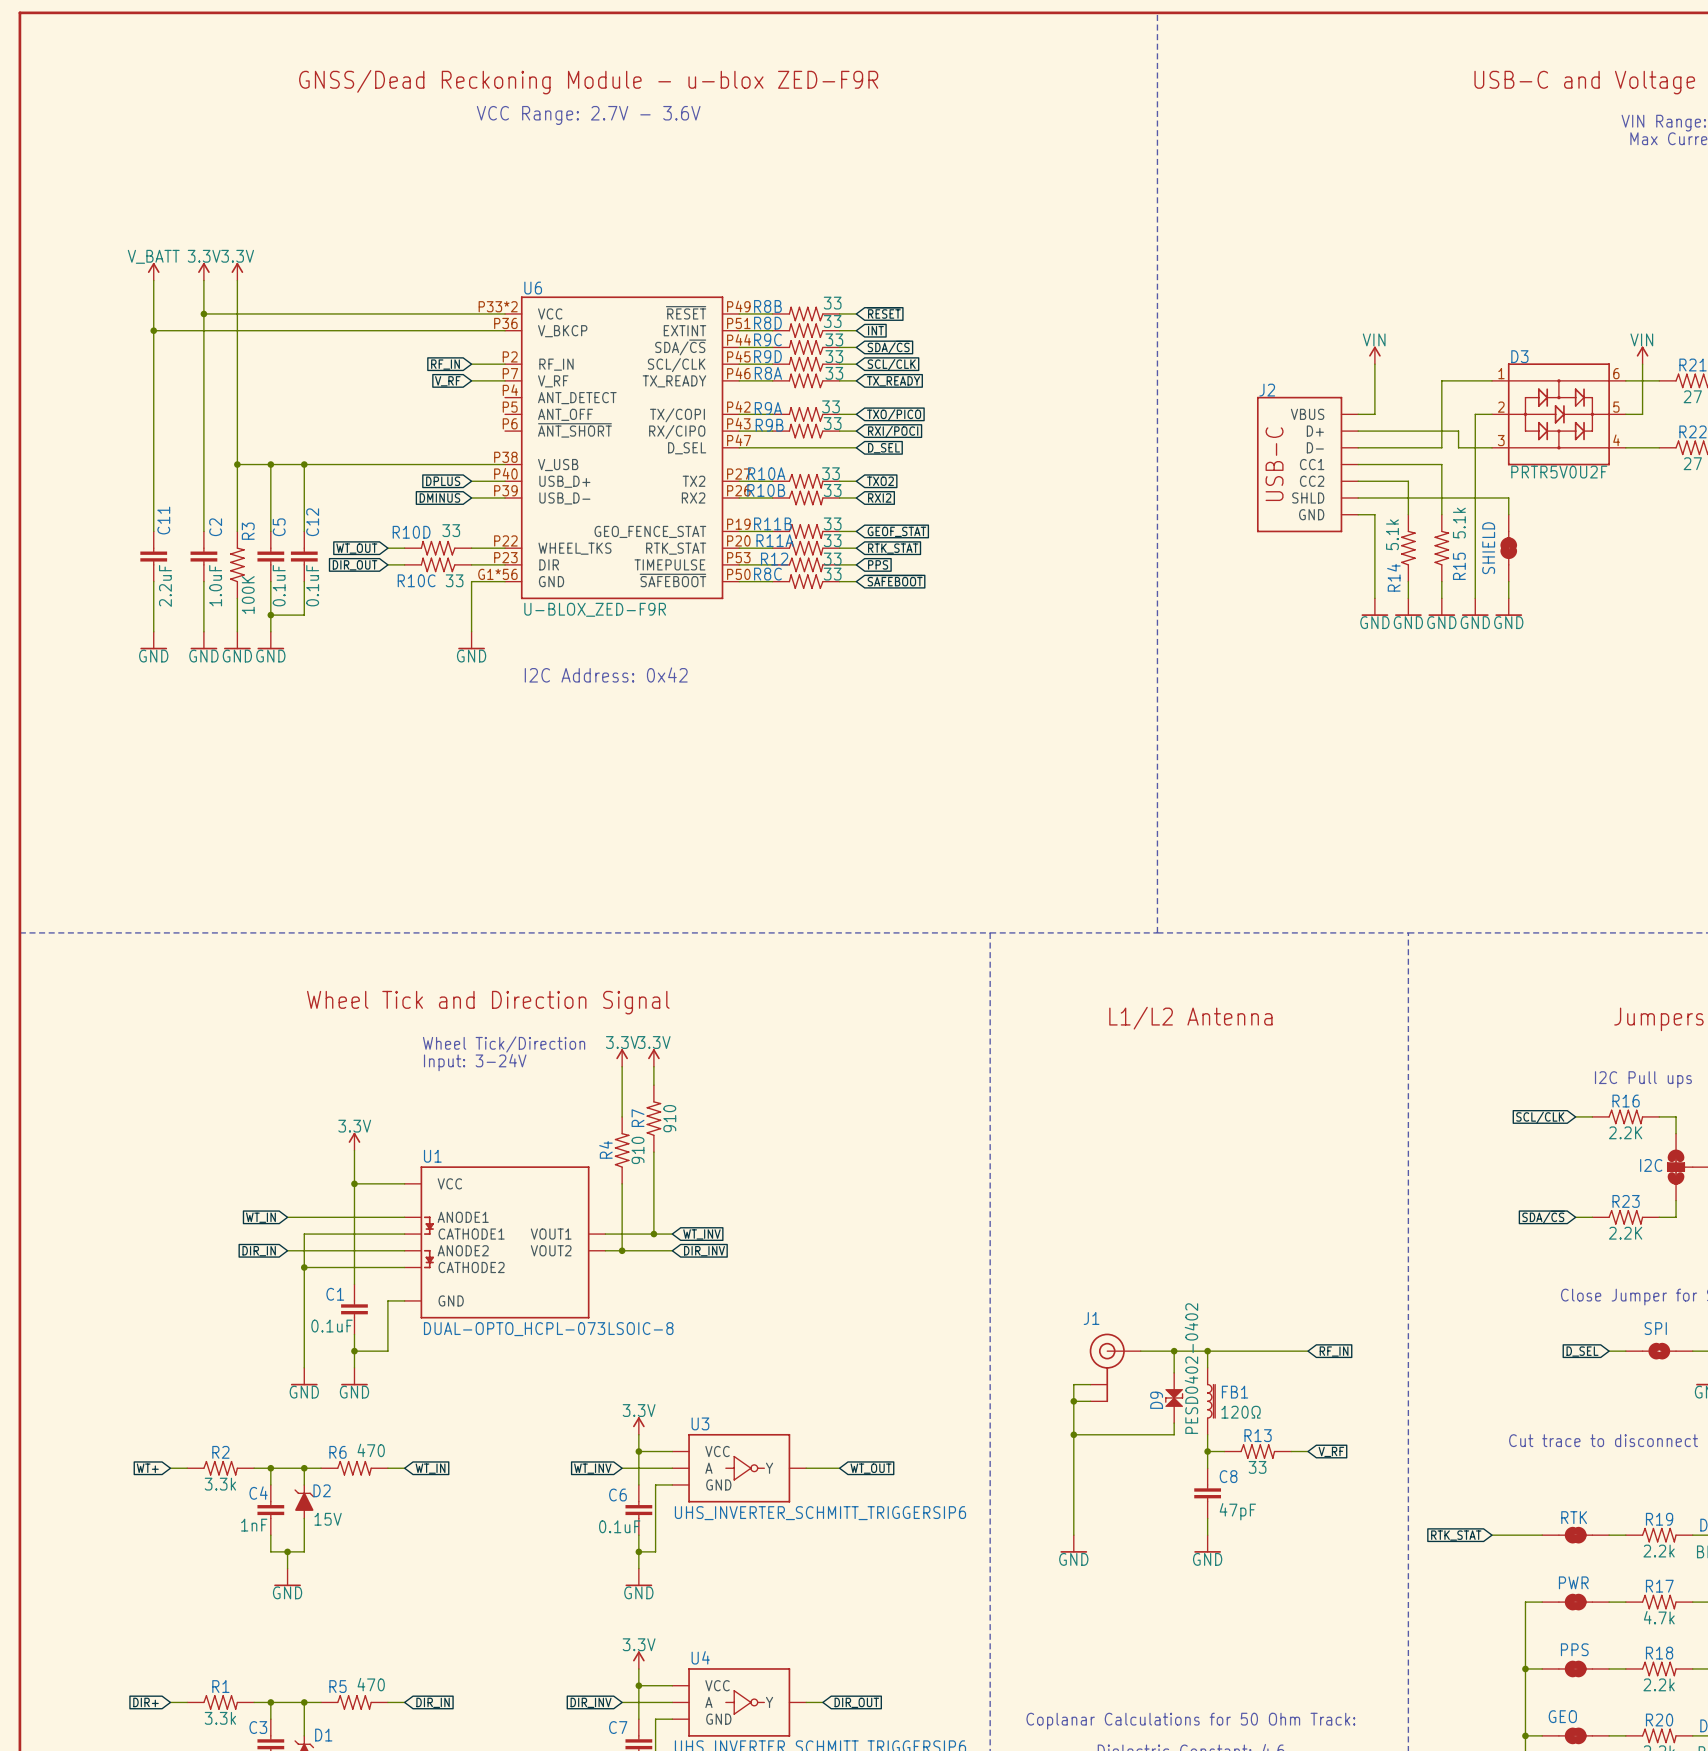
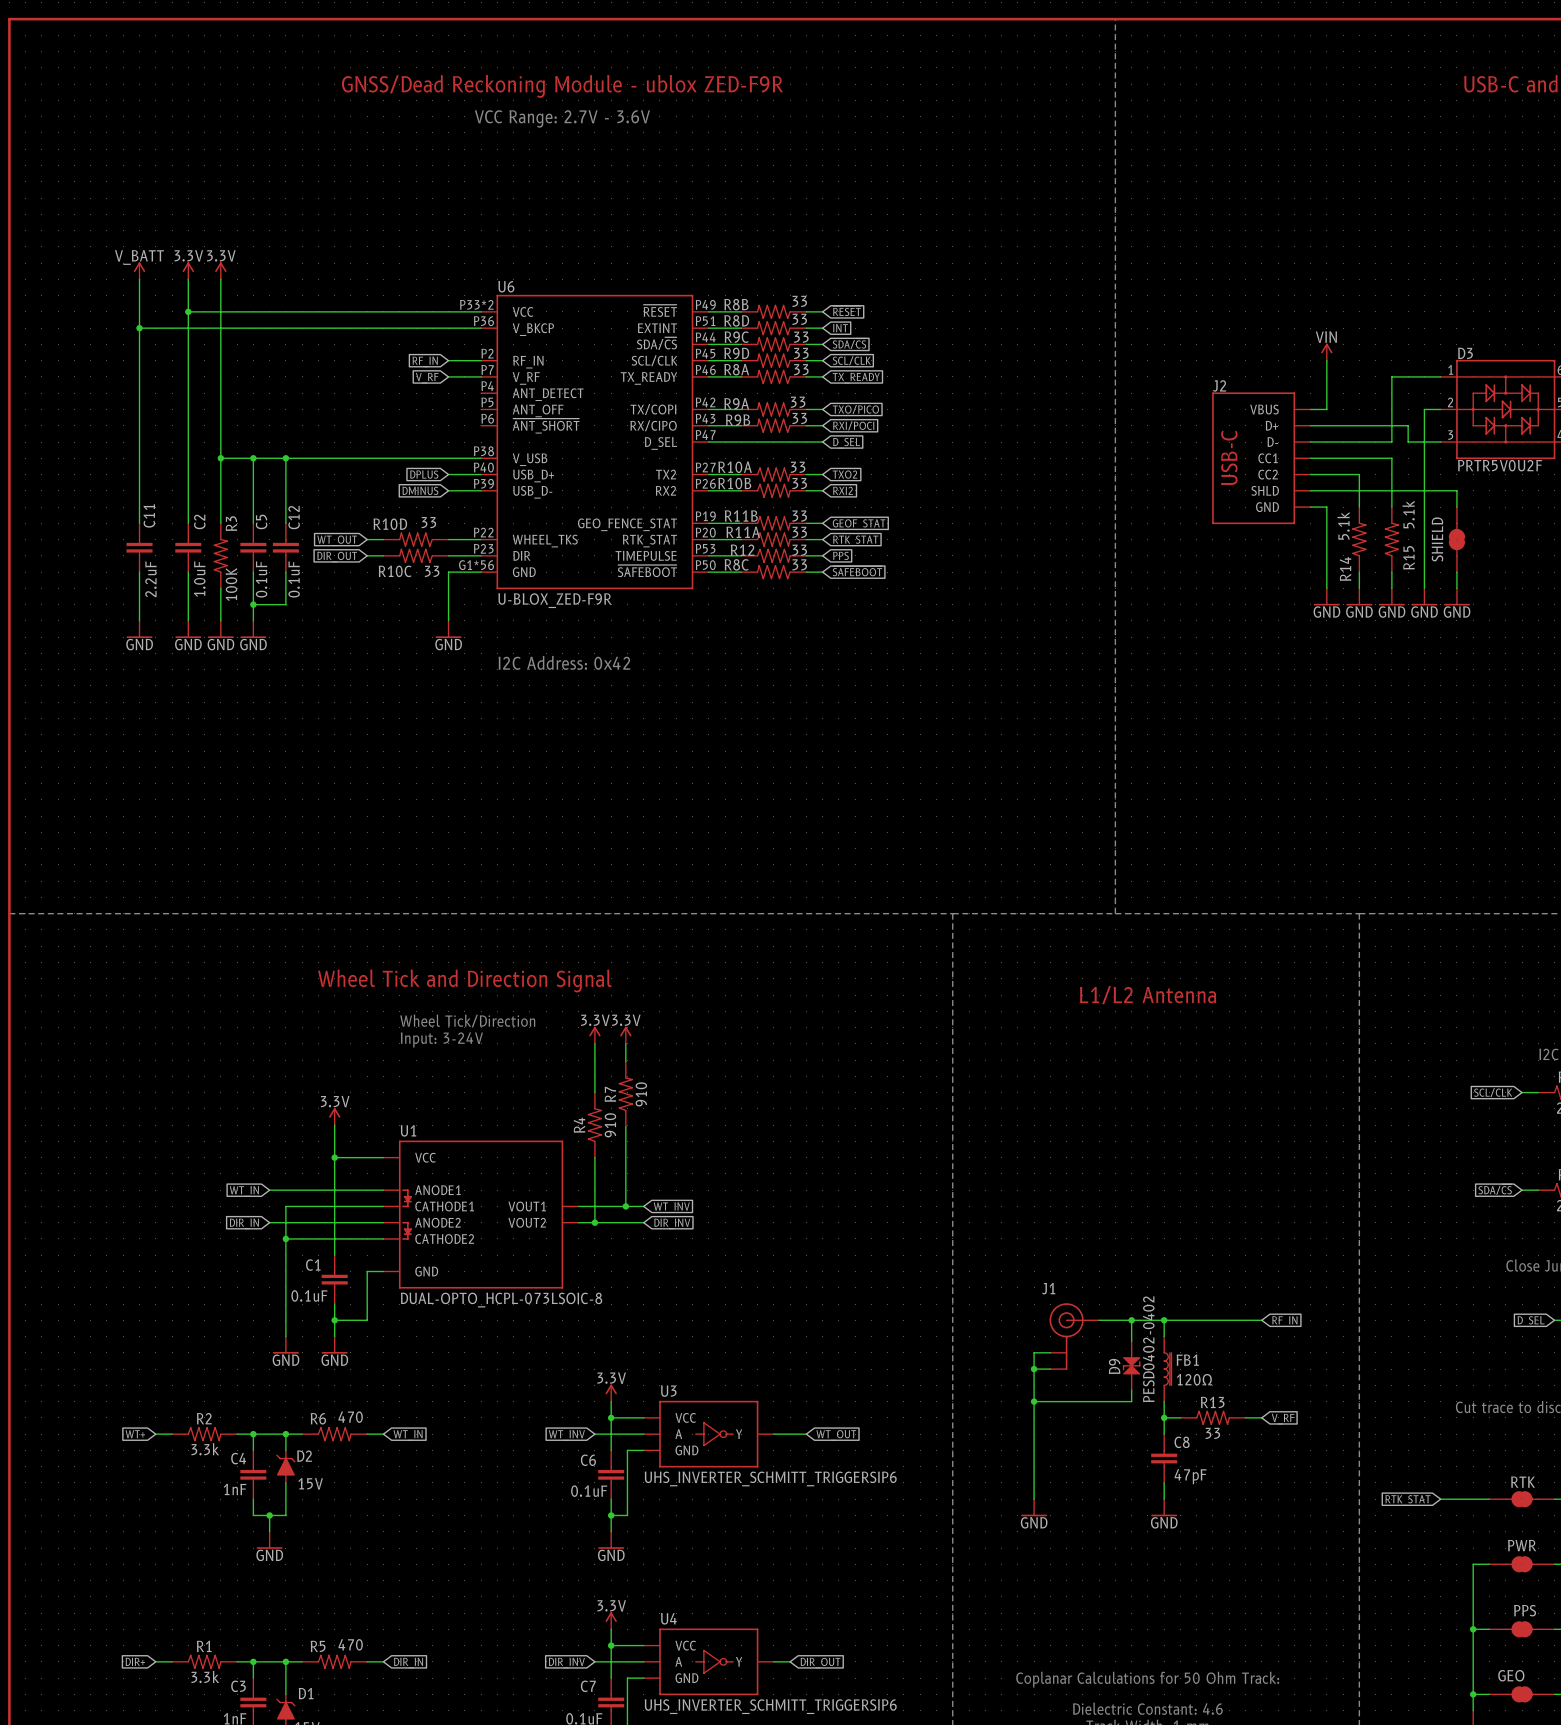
text: GNSS/Dead Reckoning Module - u-blox ZED-F9R (588, 82) -> GNSS/Dead Reckoning Module - ublox ZED-F9R (562, 86)

